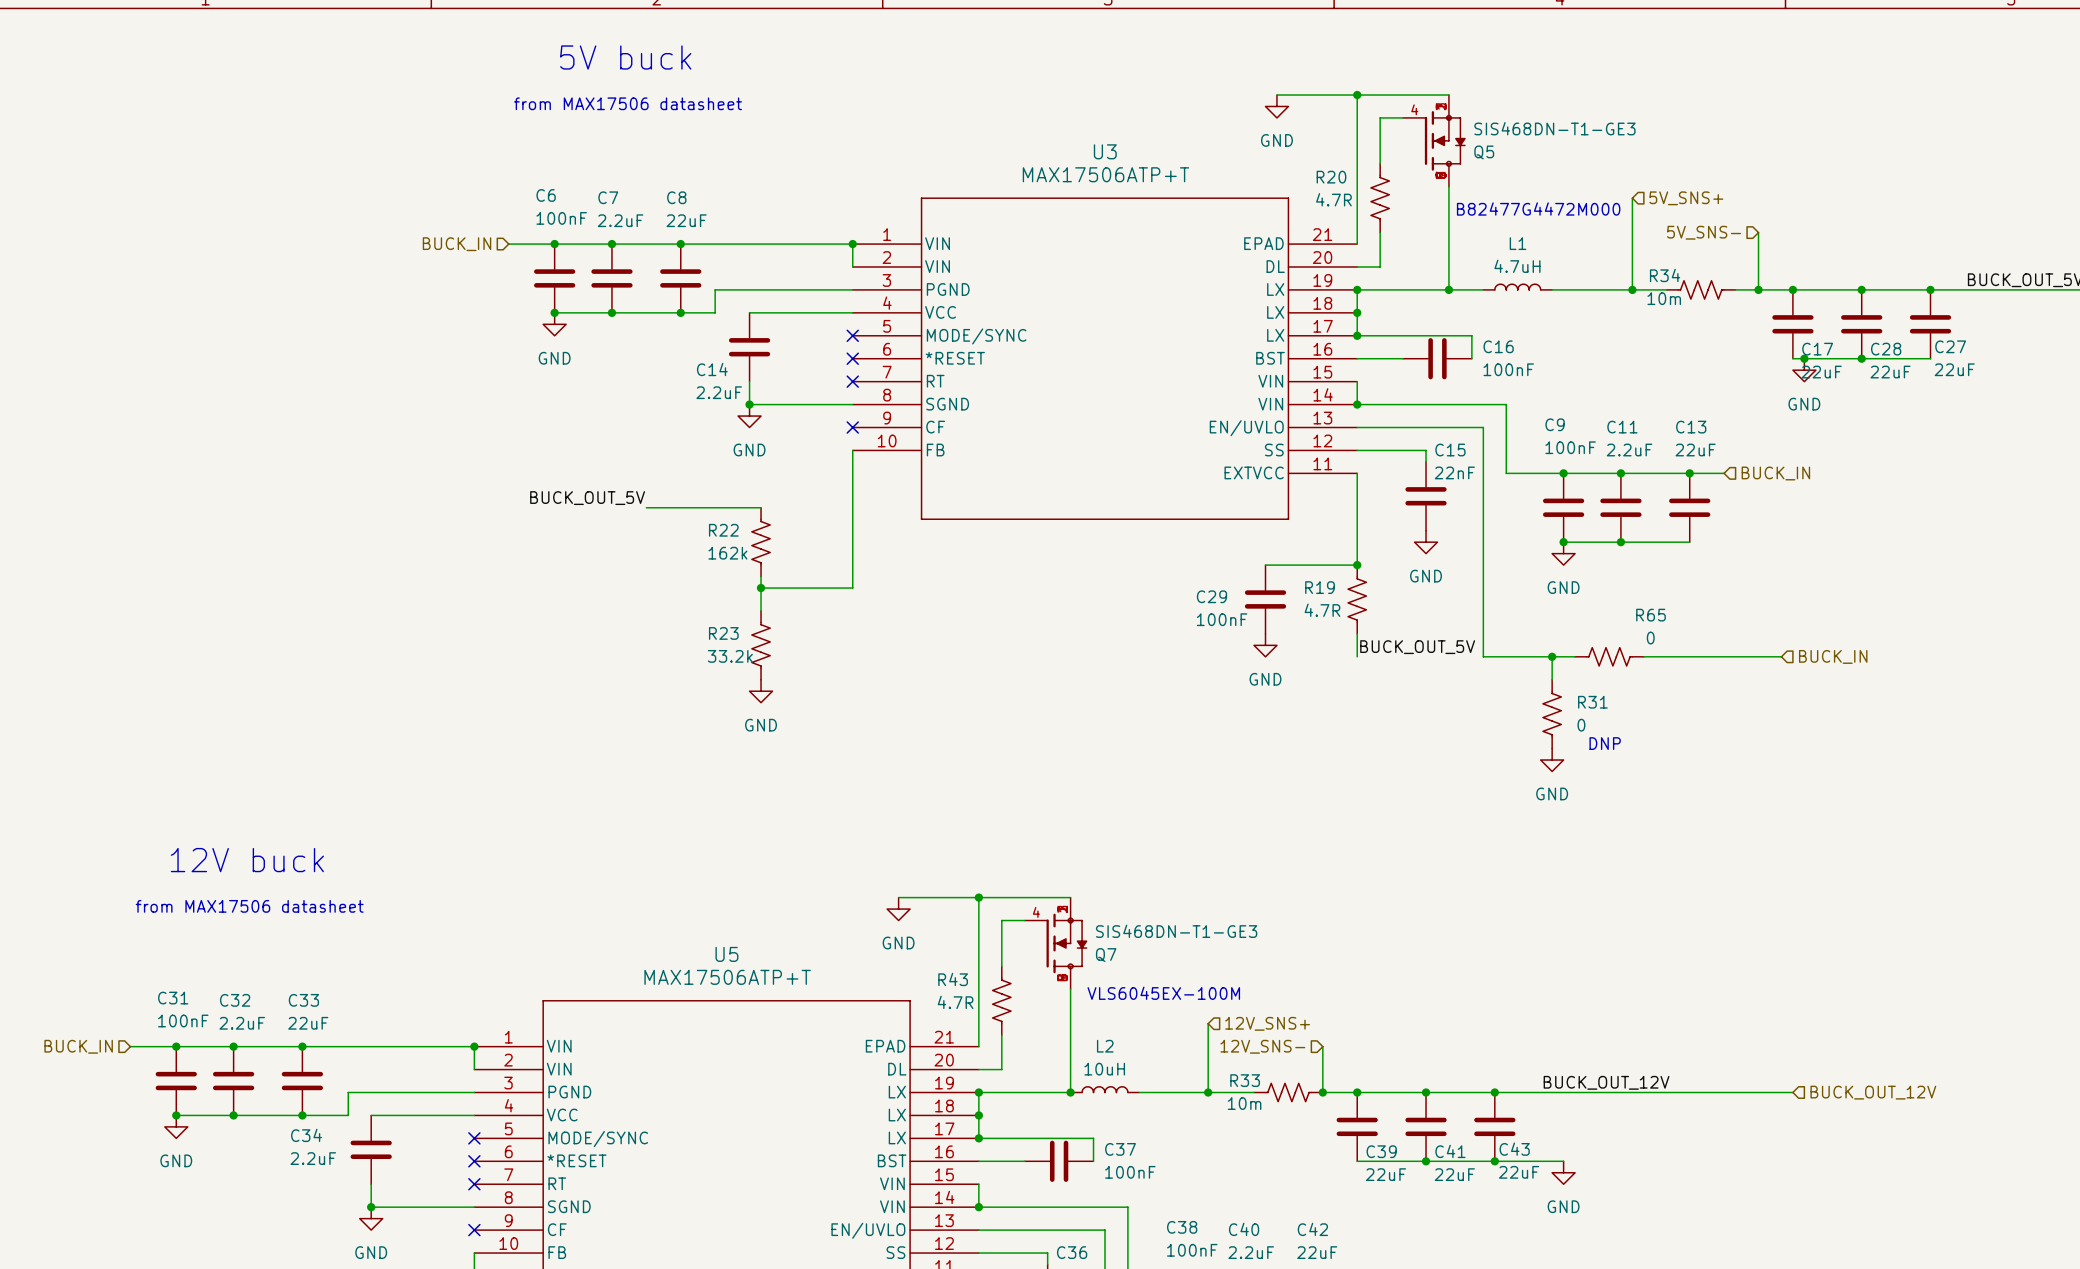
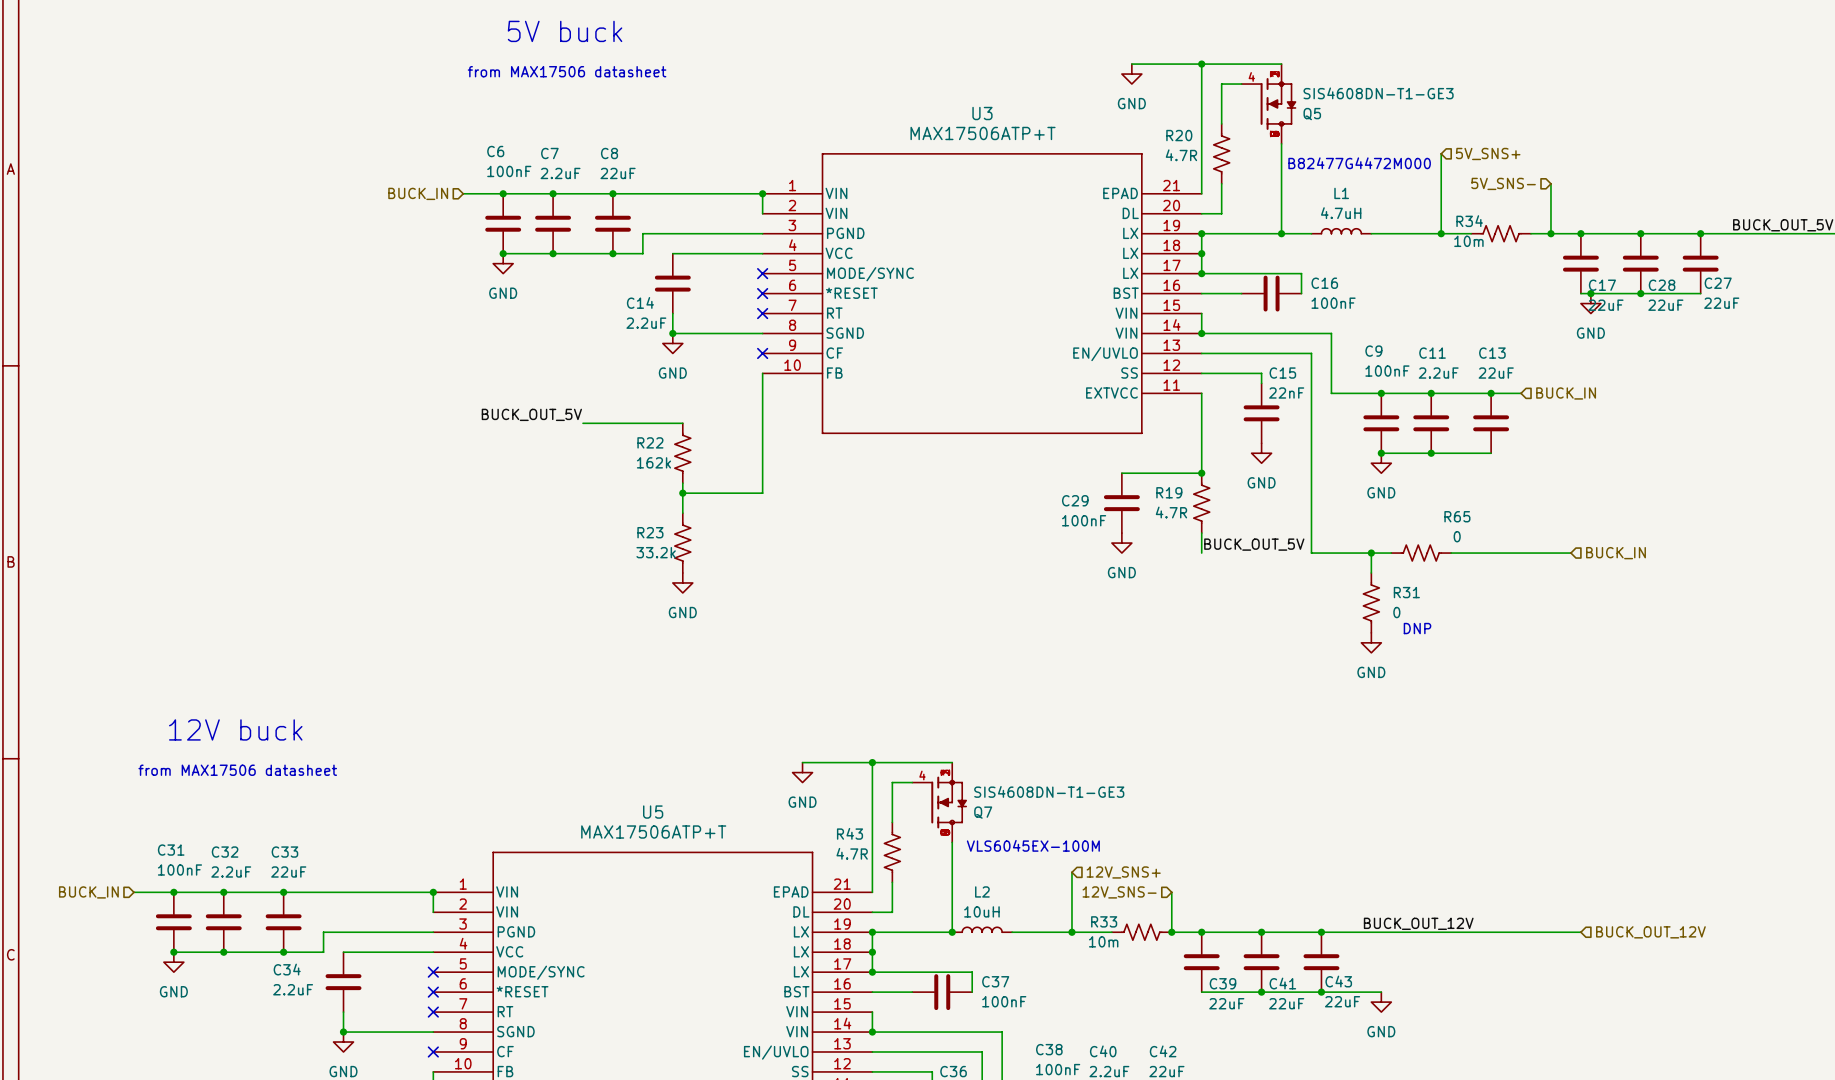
Q5 value: SIS468DN-T1-GE3 (1554, 128) -> SIS4608DN-T1-GE3 (1378, 93)
Q7 value: SIS468DN-T1-GE3 (1176, 931) -> SIS4608DN-T1-GE3 (1049, 791)

